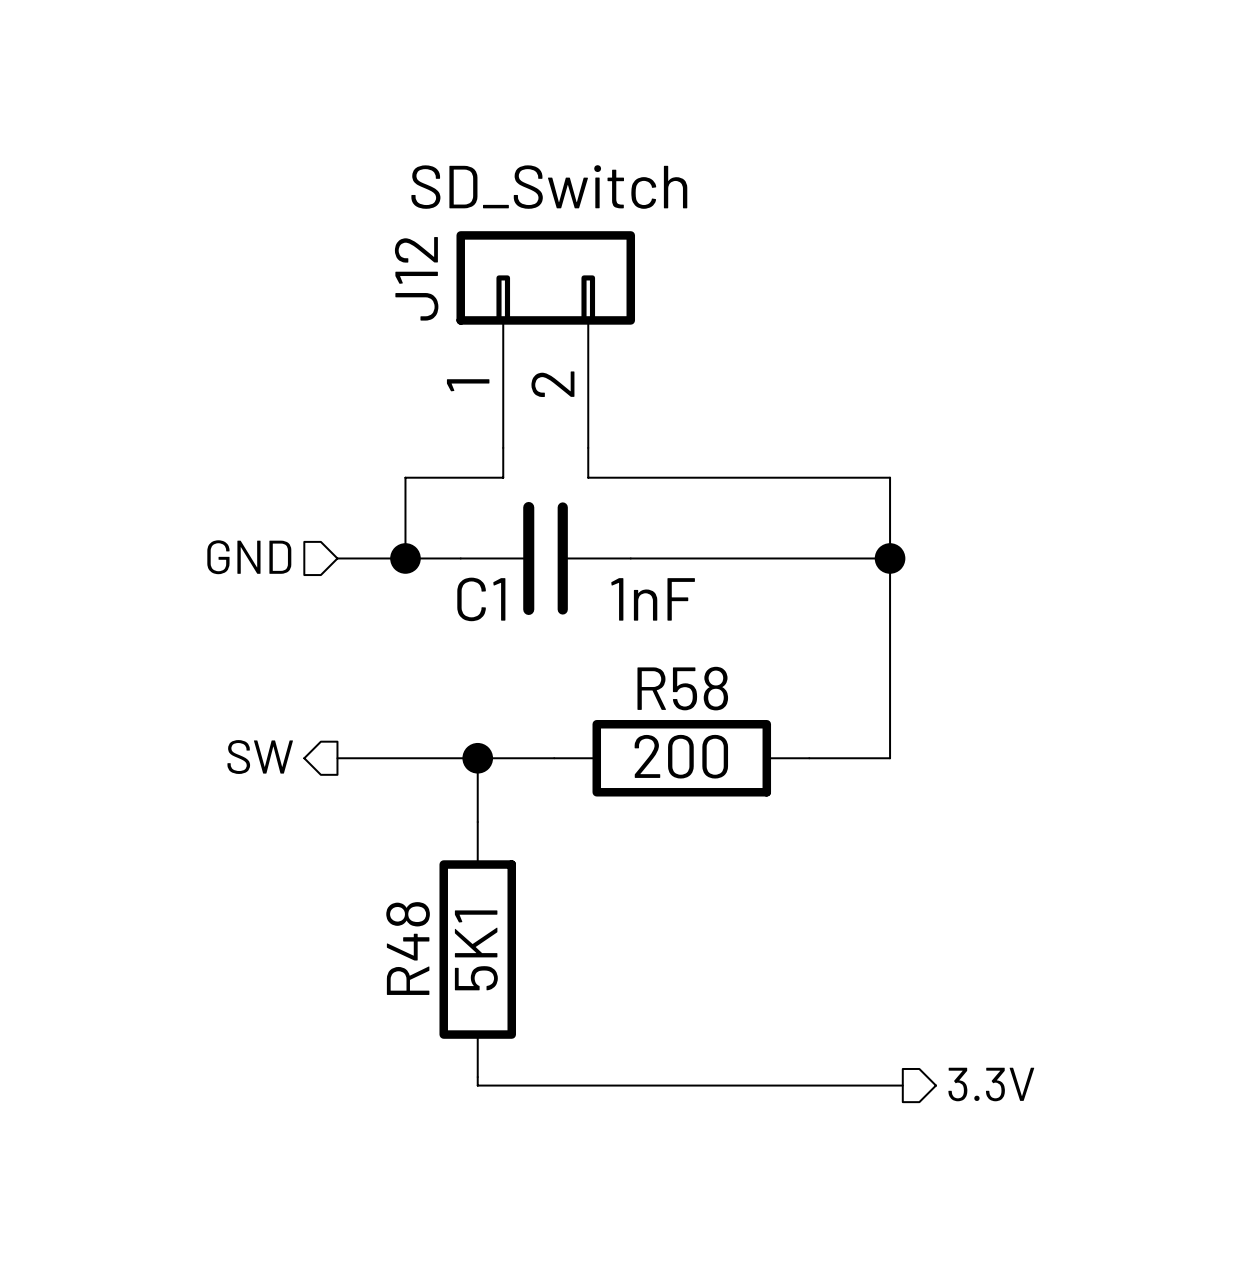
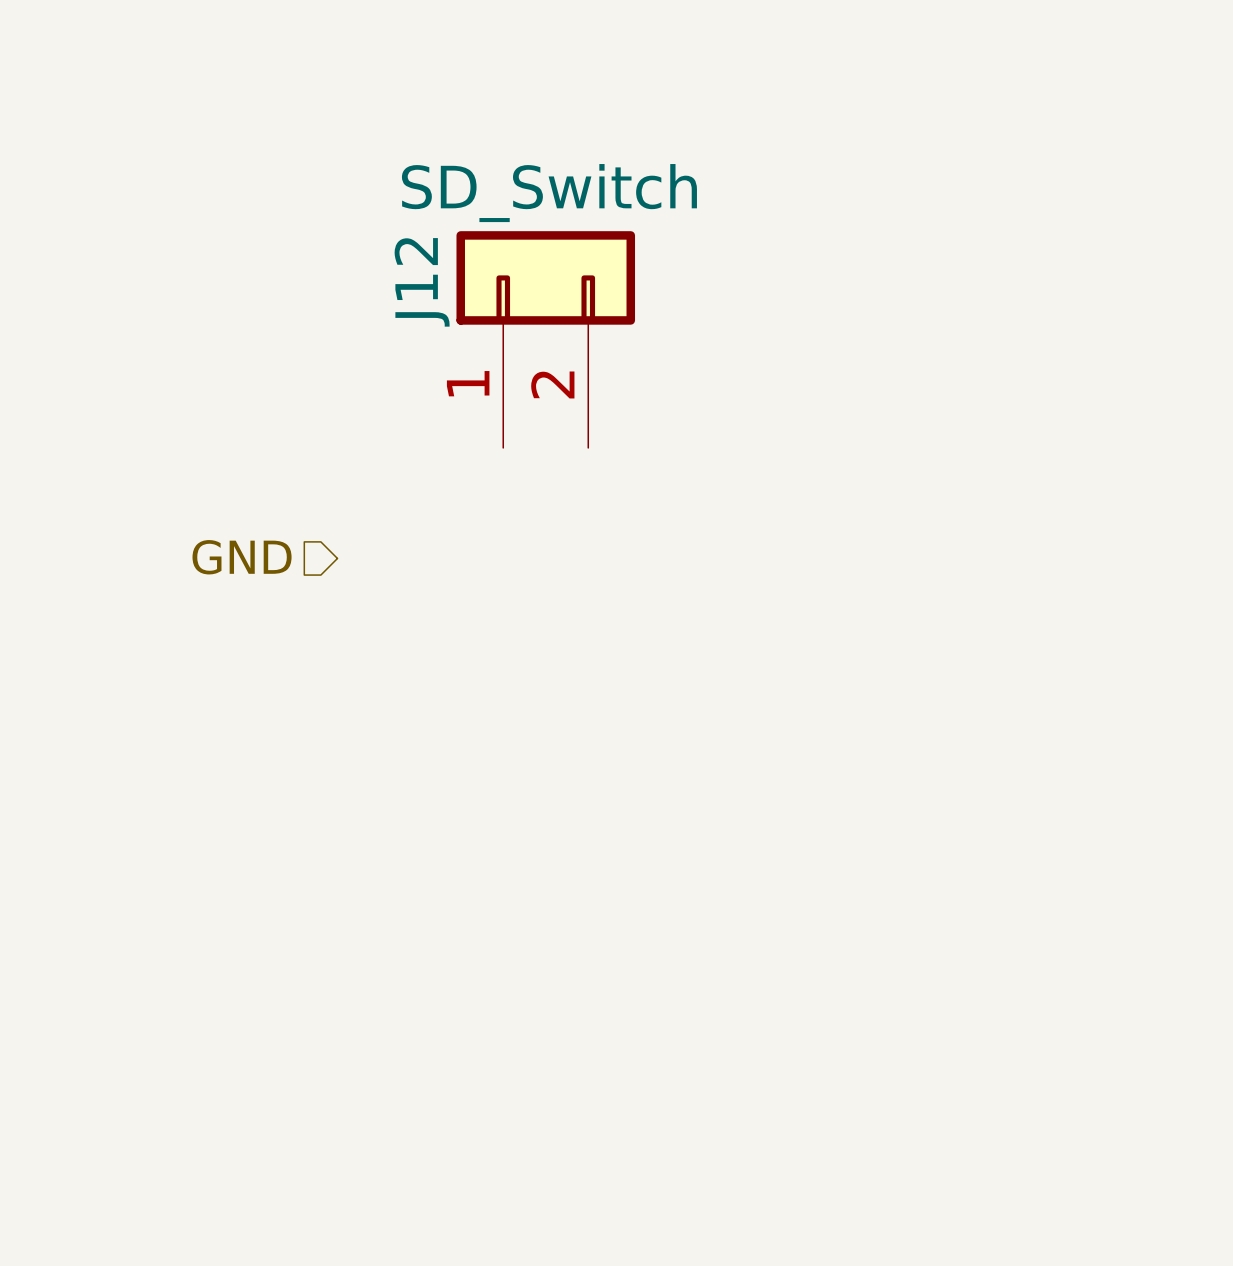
wire: (503, 447) (503, 477) (405, 477) (405, 558) -> none
wire: (588, 447) (588, 477) (890, 477) (890, 758) (809, 758) -> none
wire: (337, 558) (460, 558) -> none
junction: (405, 558) -> none
C1: 1nF (545, 558) -> none
wire: (630, 558) (890, 558) -> none
junction: (890, 558) -> none
hierarchical label: SW (260, 757) -> none
wire: (337, 758) (554, 758) -> none
wire: (477, 758) (477, 822) -> none
junction: (477, 758) -> none
R58: 200 (681, 758) -> none
R48: 5K1 (477, 949) -> none
wire: (477, 1077) (477, 1085) (902, 1085) -> none
hierarchical label: 3.3V (991, 1084) -> none

